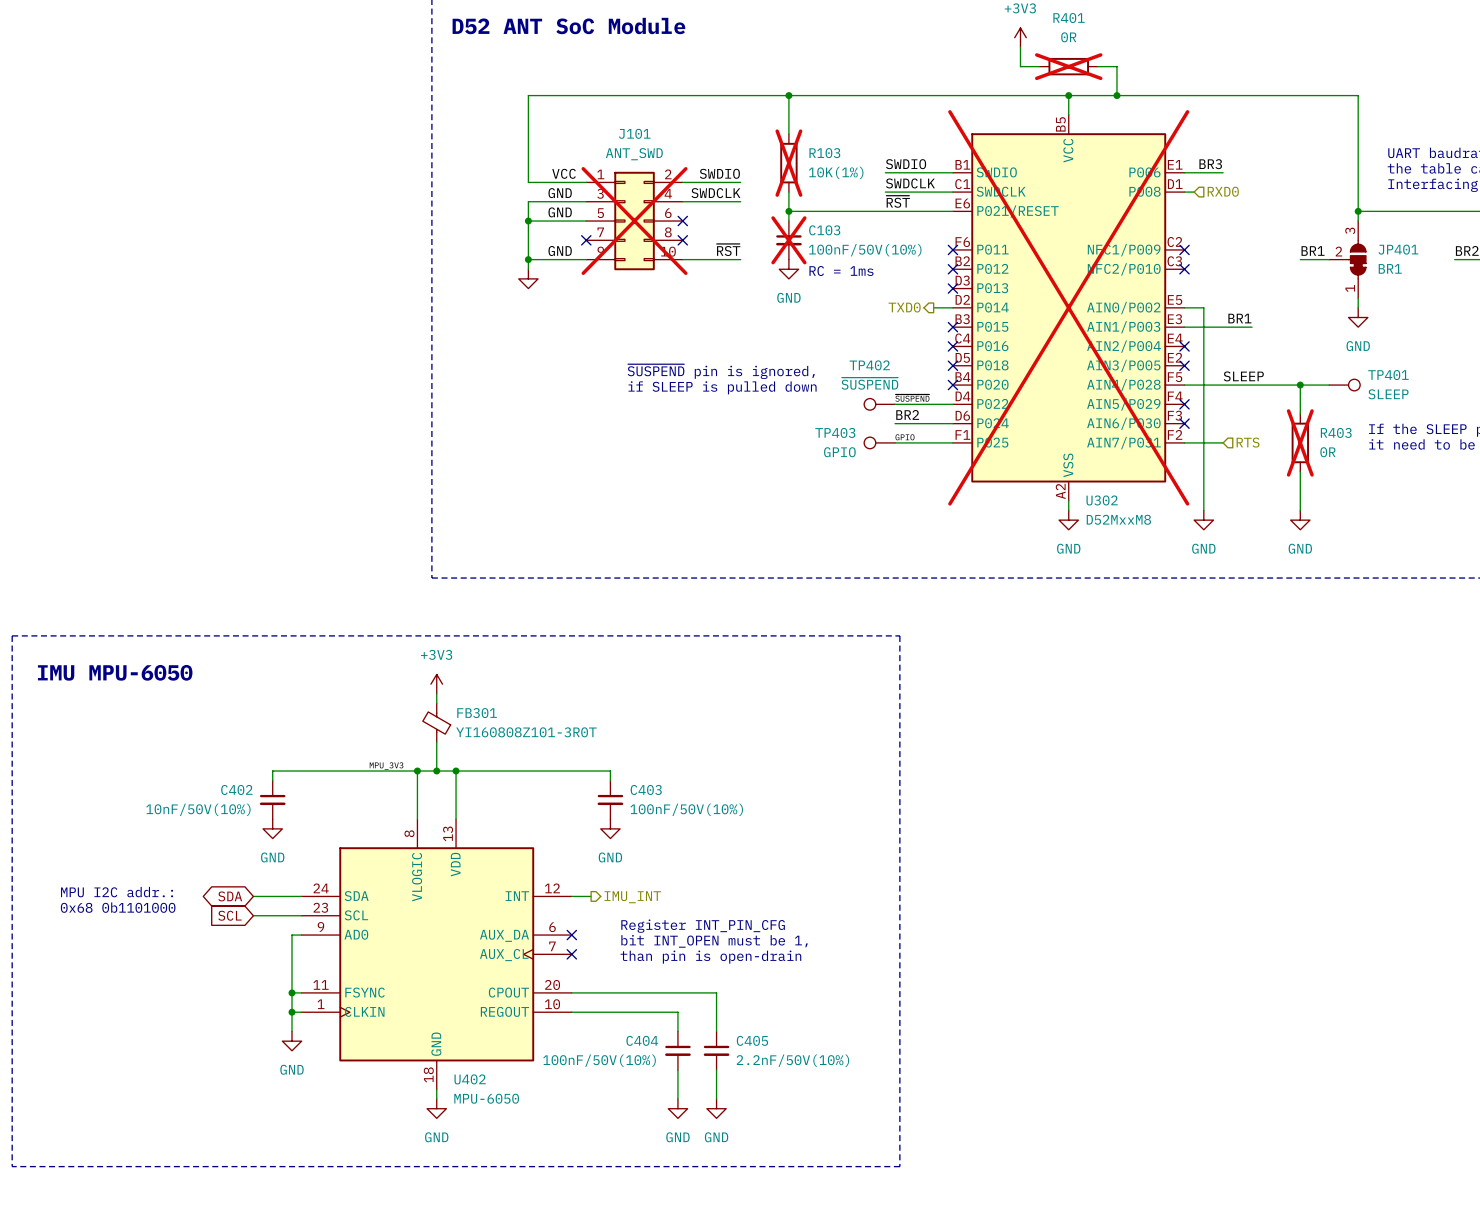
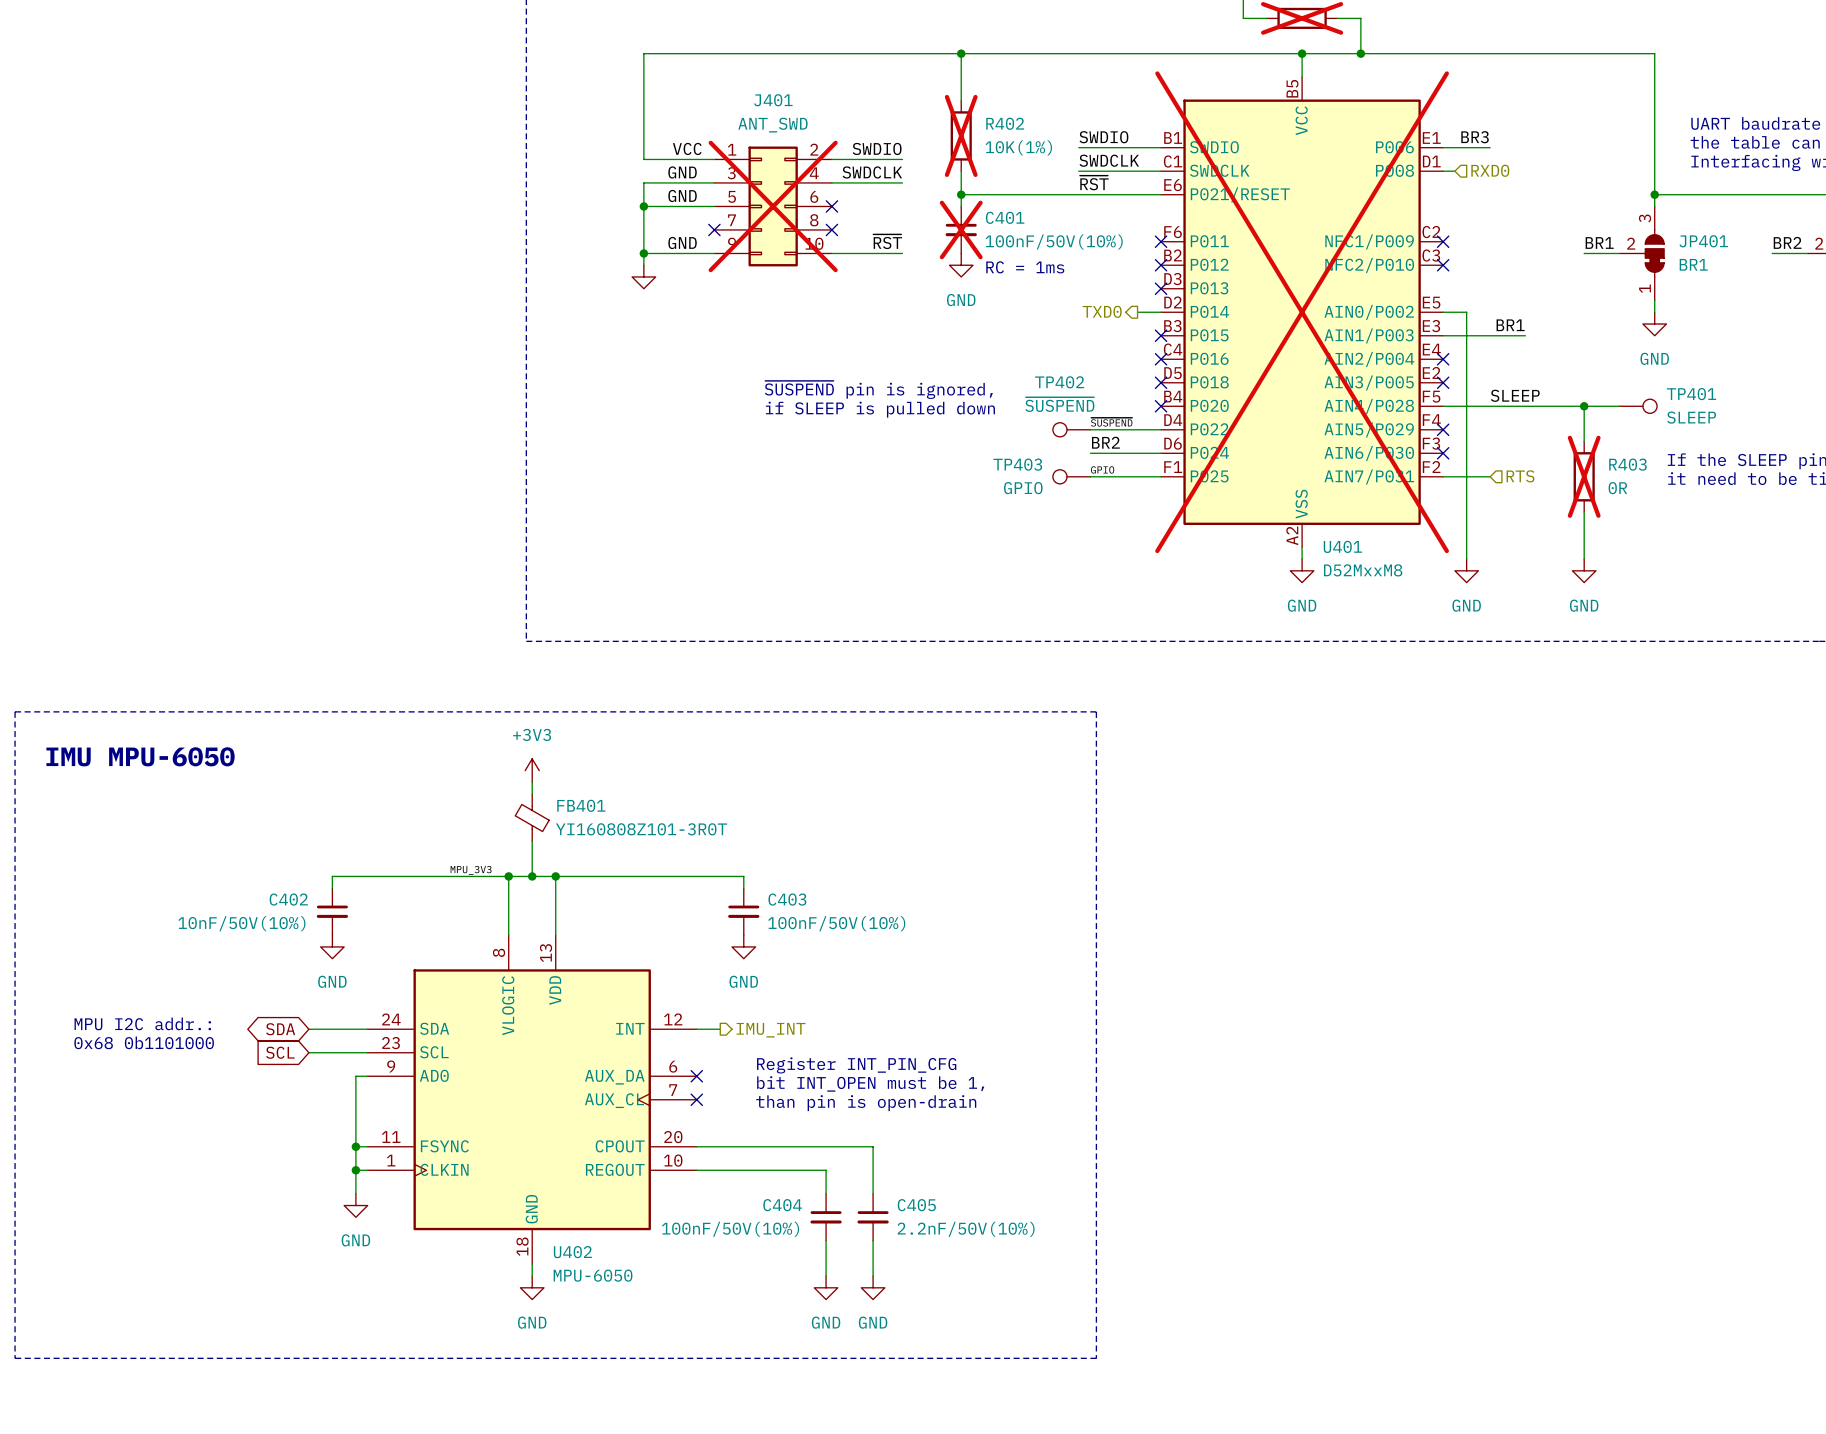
J101 name: J101 (634, 133) -> J401 (773, 100)
R103 name: R103 (824, 153) -> R402 (1005, 123)
C103 name: C103 (824, 230) -> C401 (1005, 217)
U302 name: U302 (1102, 500) -> U401 (1342, 546)
FB301 name: FB301 (477, 713) -> FB401 (581, 805)

